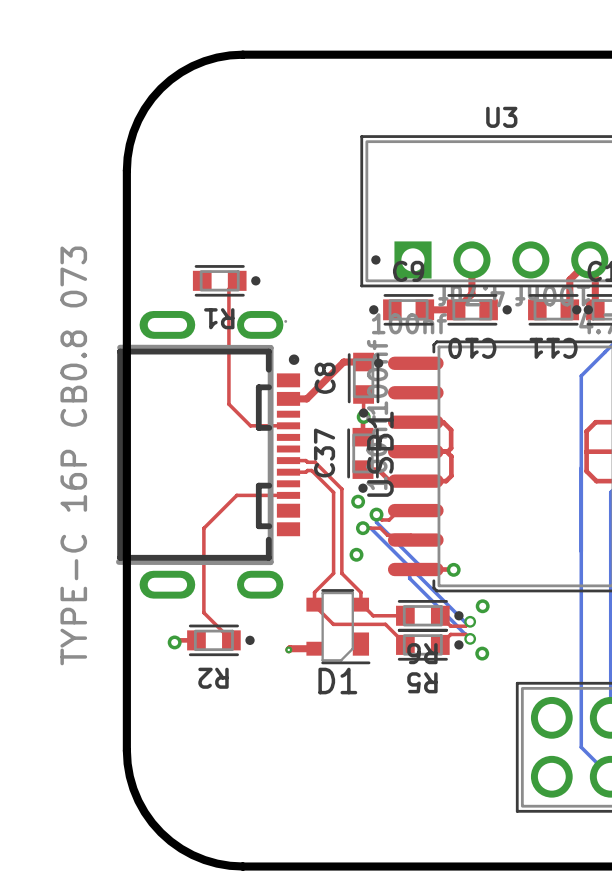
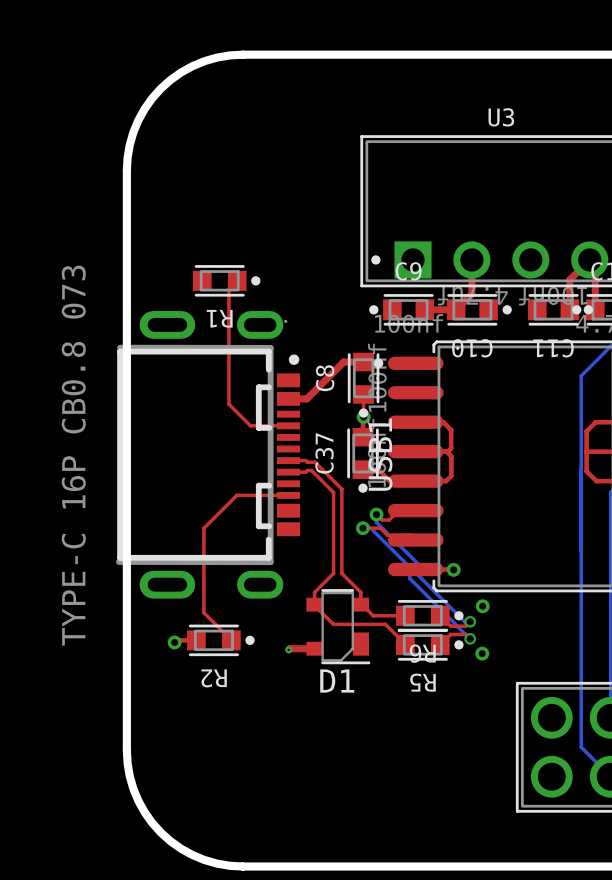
via: (358, 501) -> none
via: (356, 554) -> none

